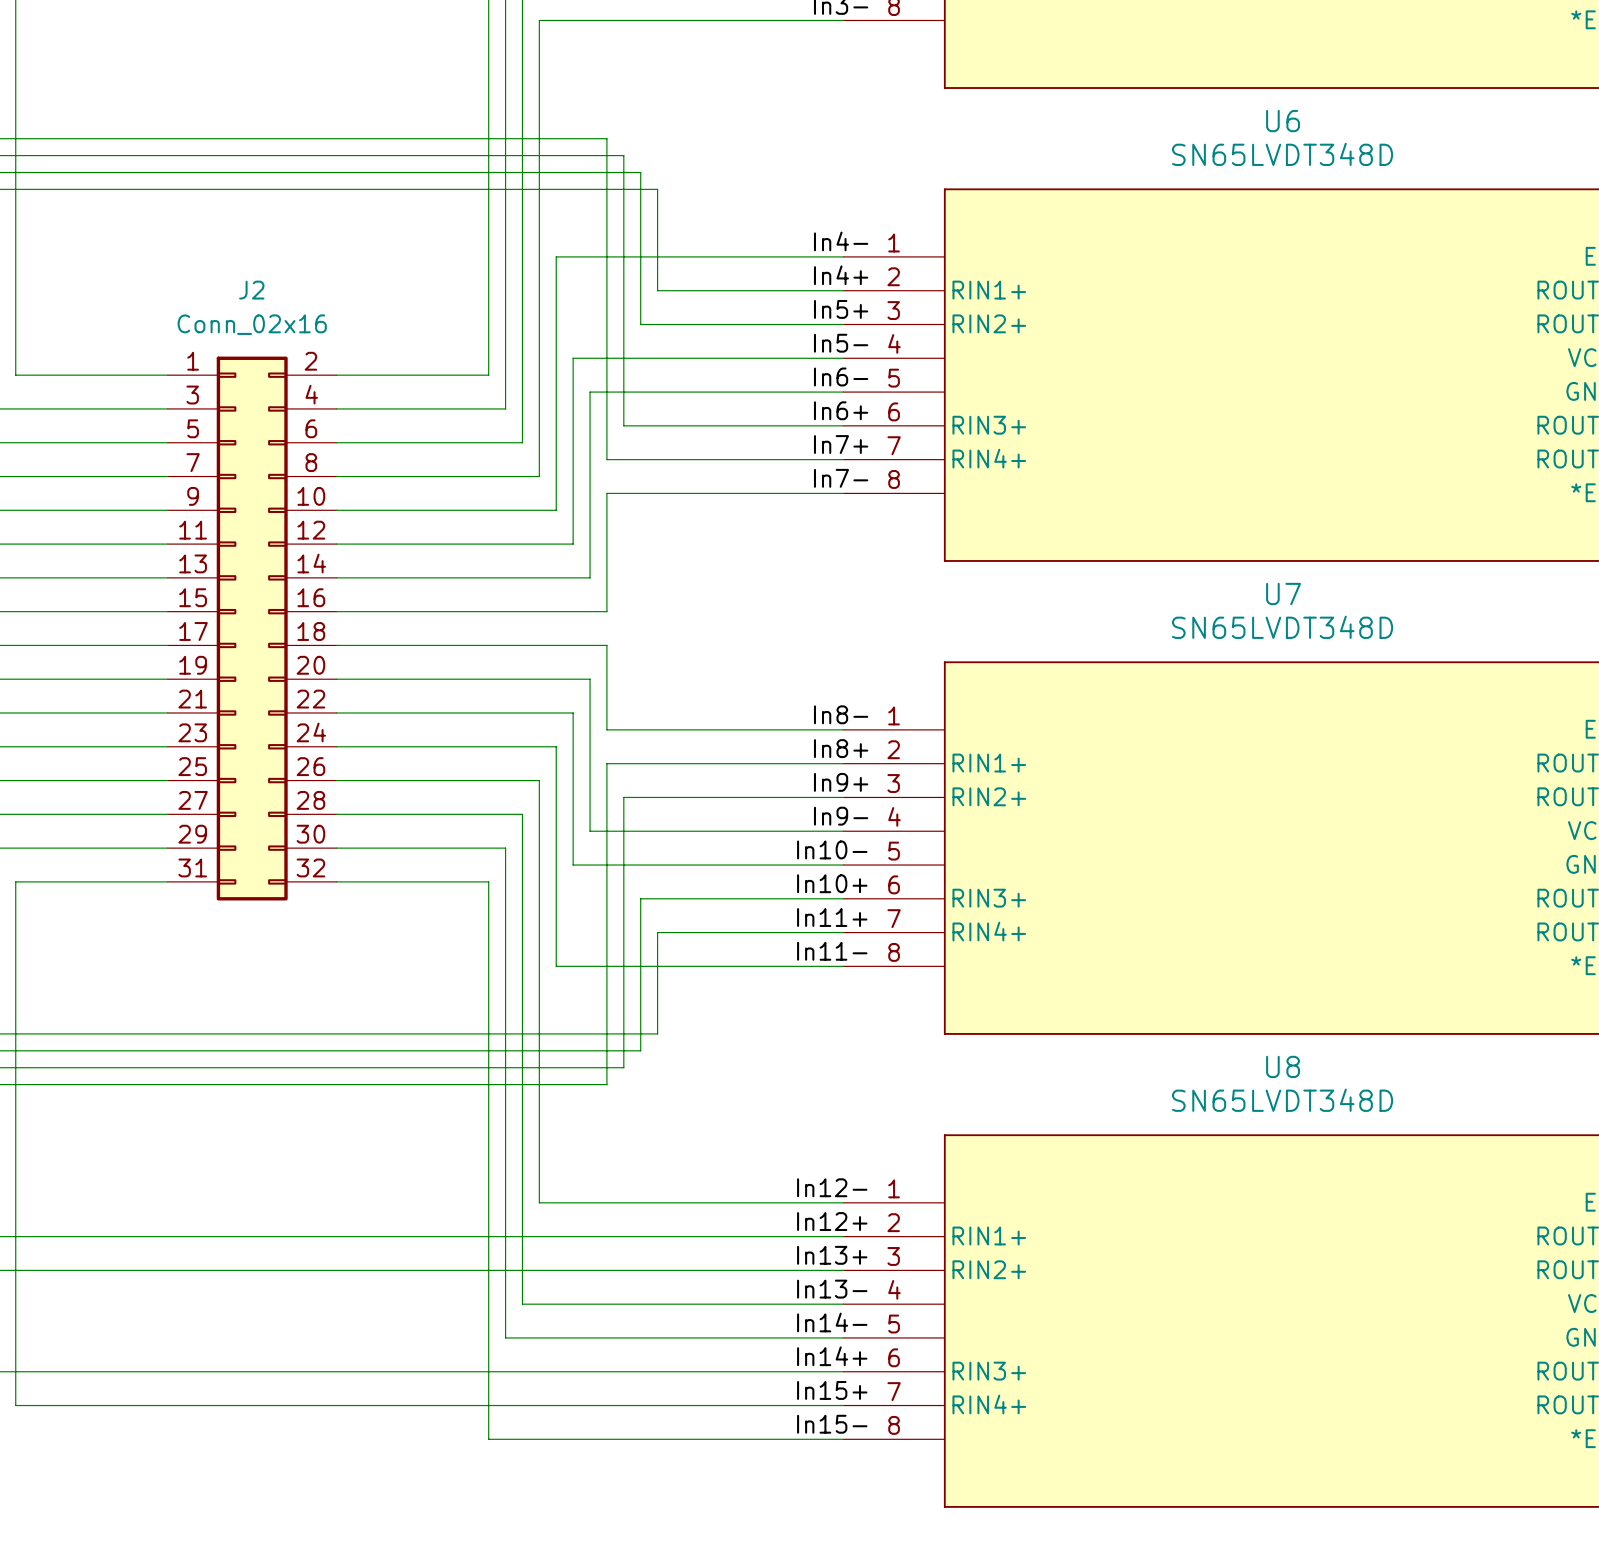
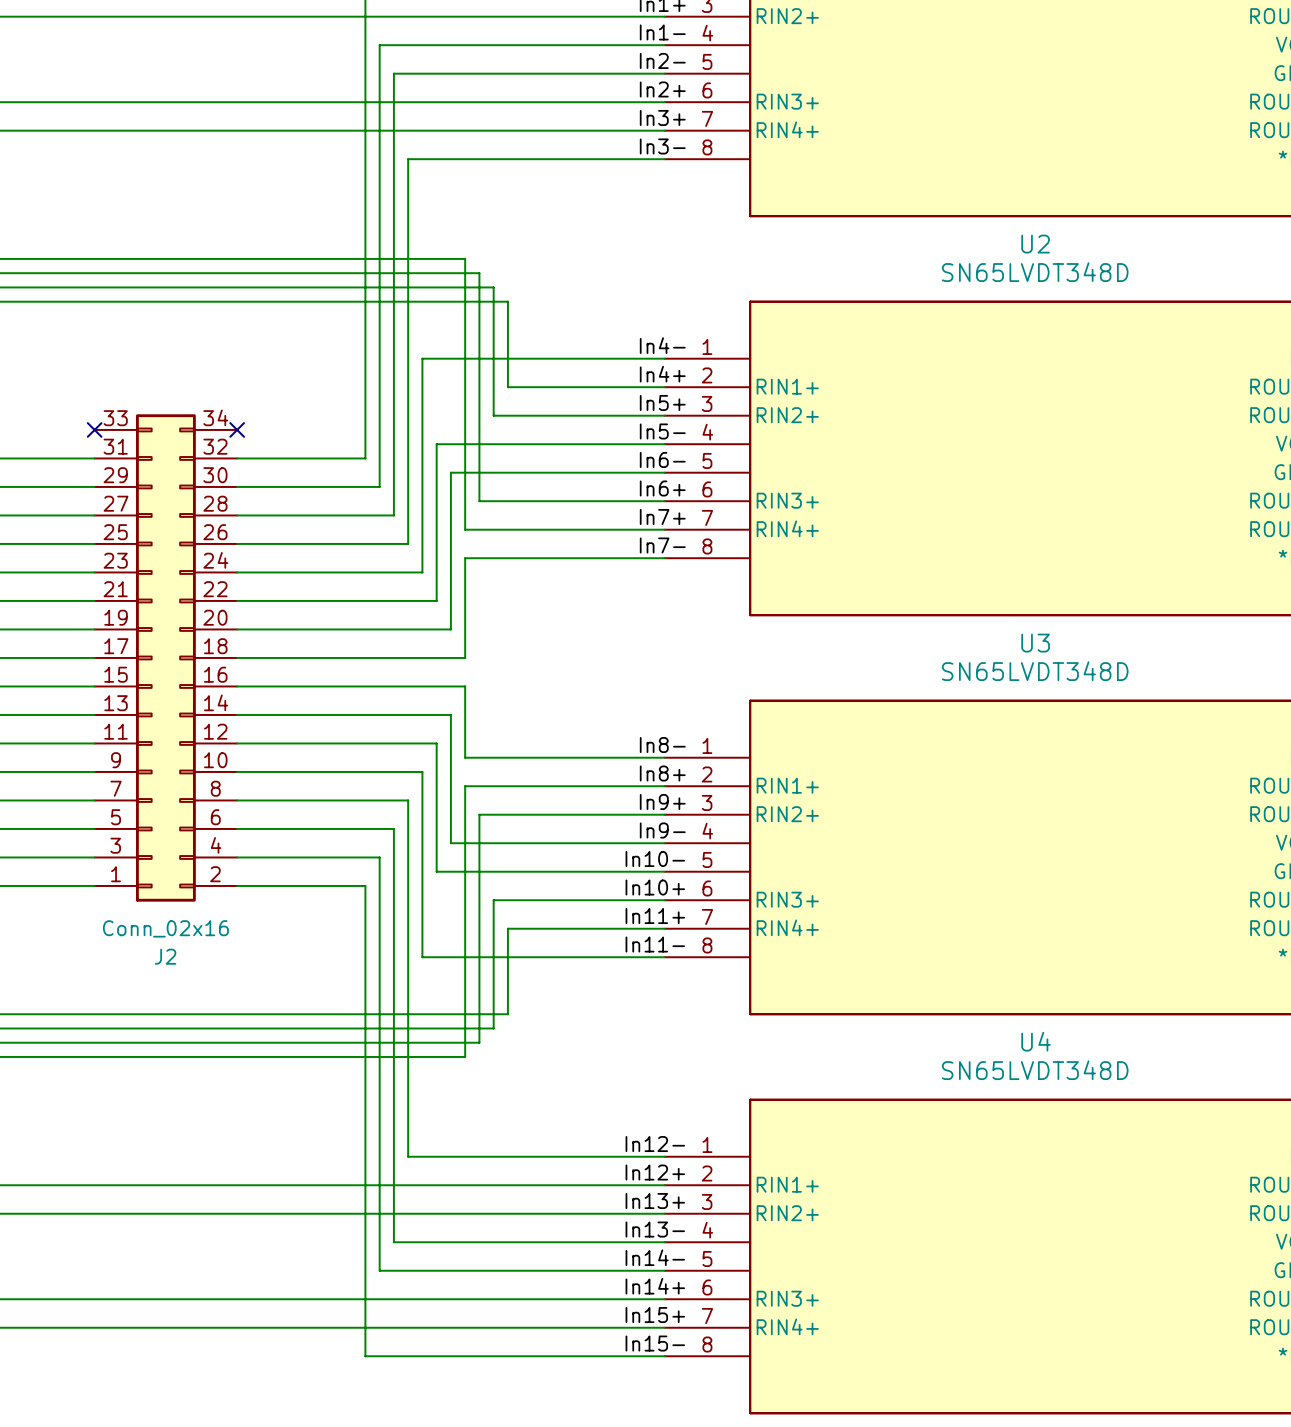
U6 name: U6 (1283, 121) -> U2 (1035, 244)
J2 name position: J2 (251, 290) -> J2 (165, 956)
J2 value position: Conn_02x16 (252, 324) -> Conn_02x16 (165, 928)
no-connect mark: none -> (94, 429)
no-connect mark: none -> (237, 429)
J2 symbol: [167, 356, 337, 901] -> [94, 414, 238, 902]
U7 name: U7 (1283, 594) -> U3 (1035, 643)
U8 name: U8 (1283, 1066) -> U4 (1036, 1041)

